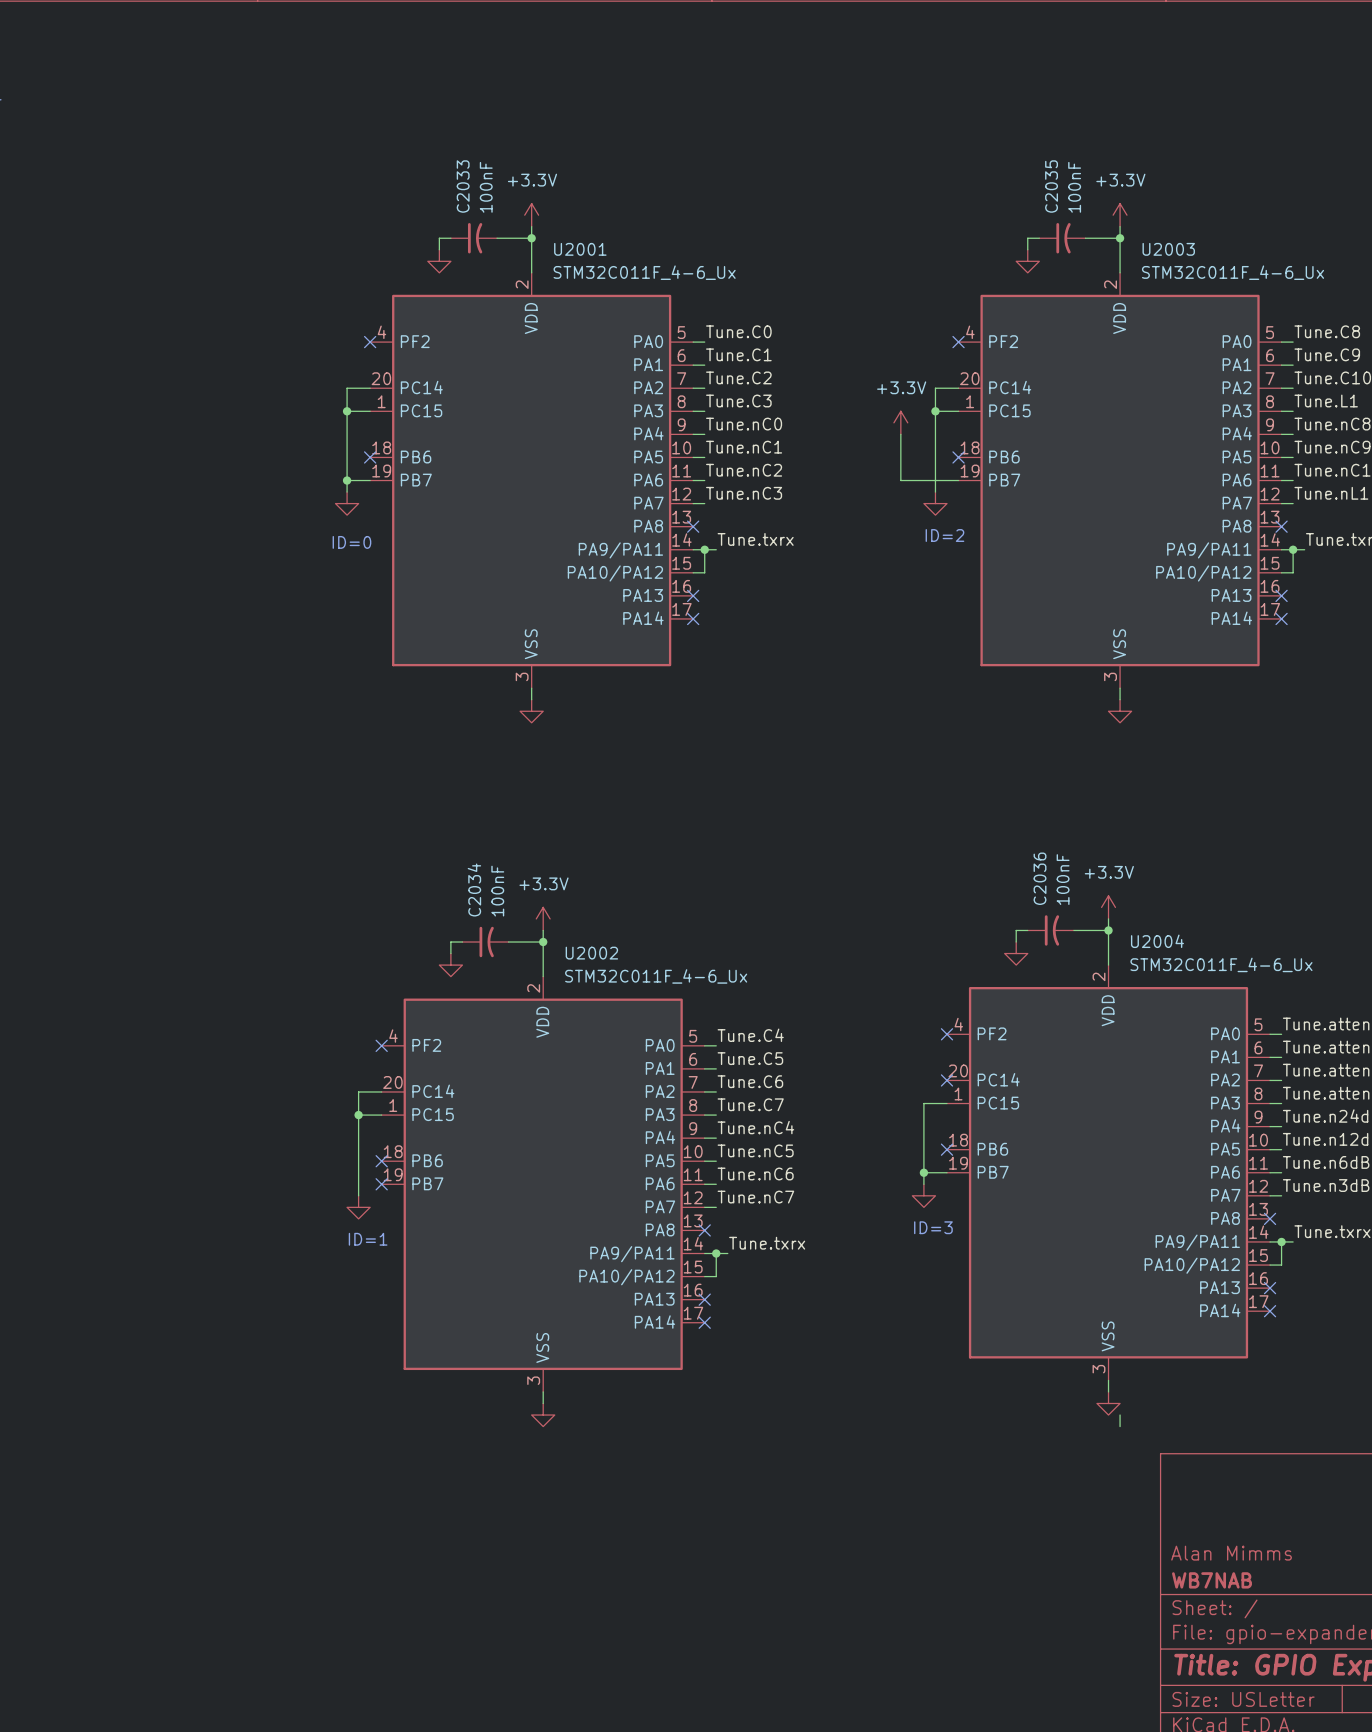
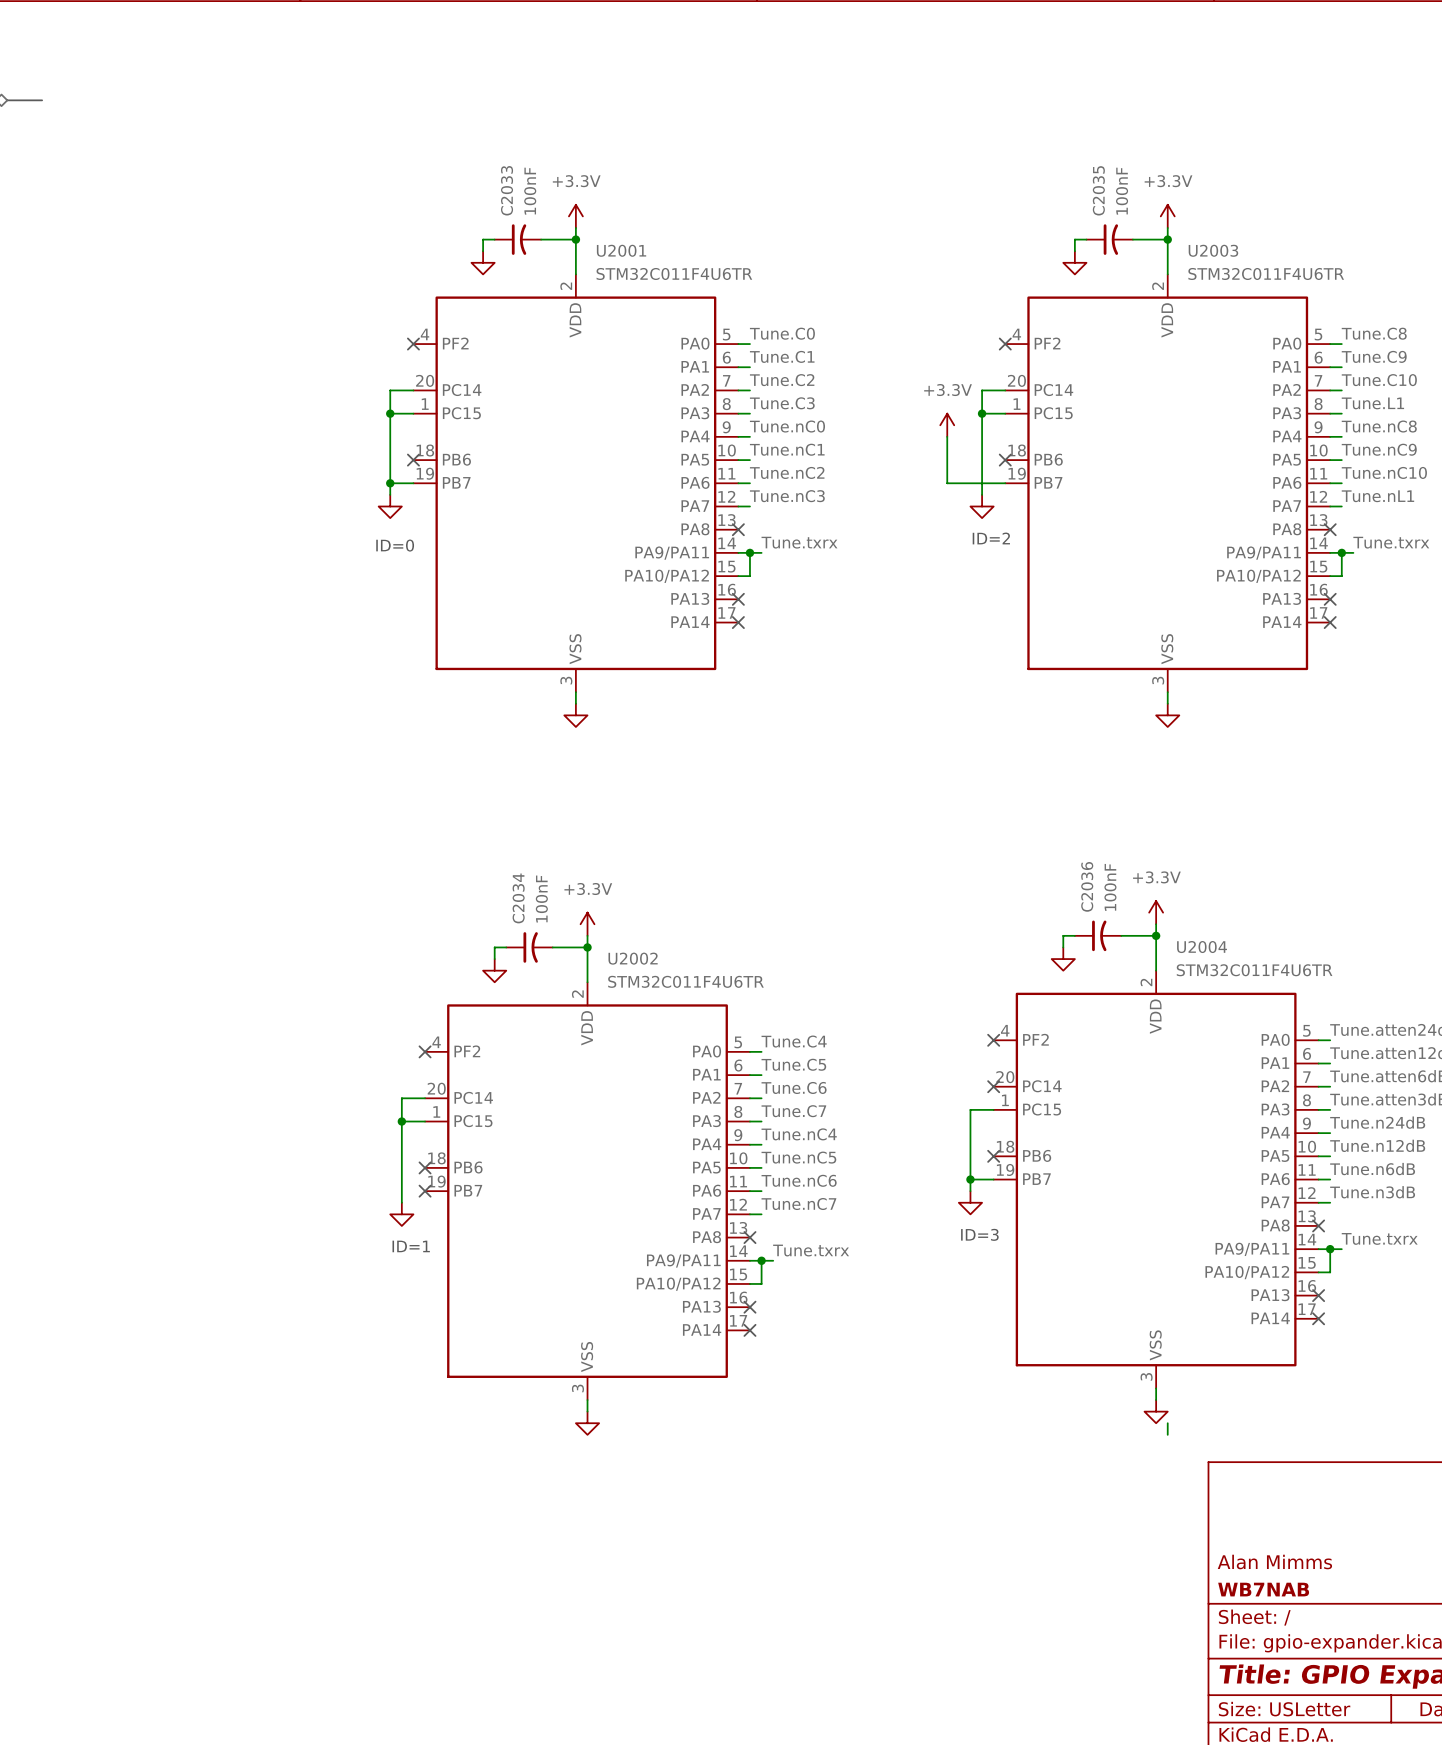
U2001 value: STM32C011F_4-6_Ux (644, 272) -> STM32C011F4U6TR (674, 273)
U2003 value: STM32C011F_4-6_Ux (1233, 272) -> STM32C011F4U6TR (1266, 273)
U2004 value: STM32C011F_4-6_Ux (1221, 964) -> STM32C011F4U6TR (1254, 970)
U2002 value: STM32C011F_4-6_Ux (656, 976) -> STM32C011F4U6TR (685, 981)

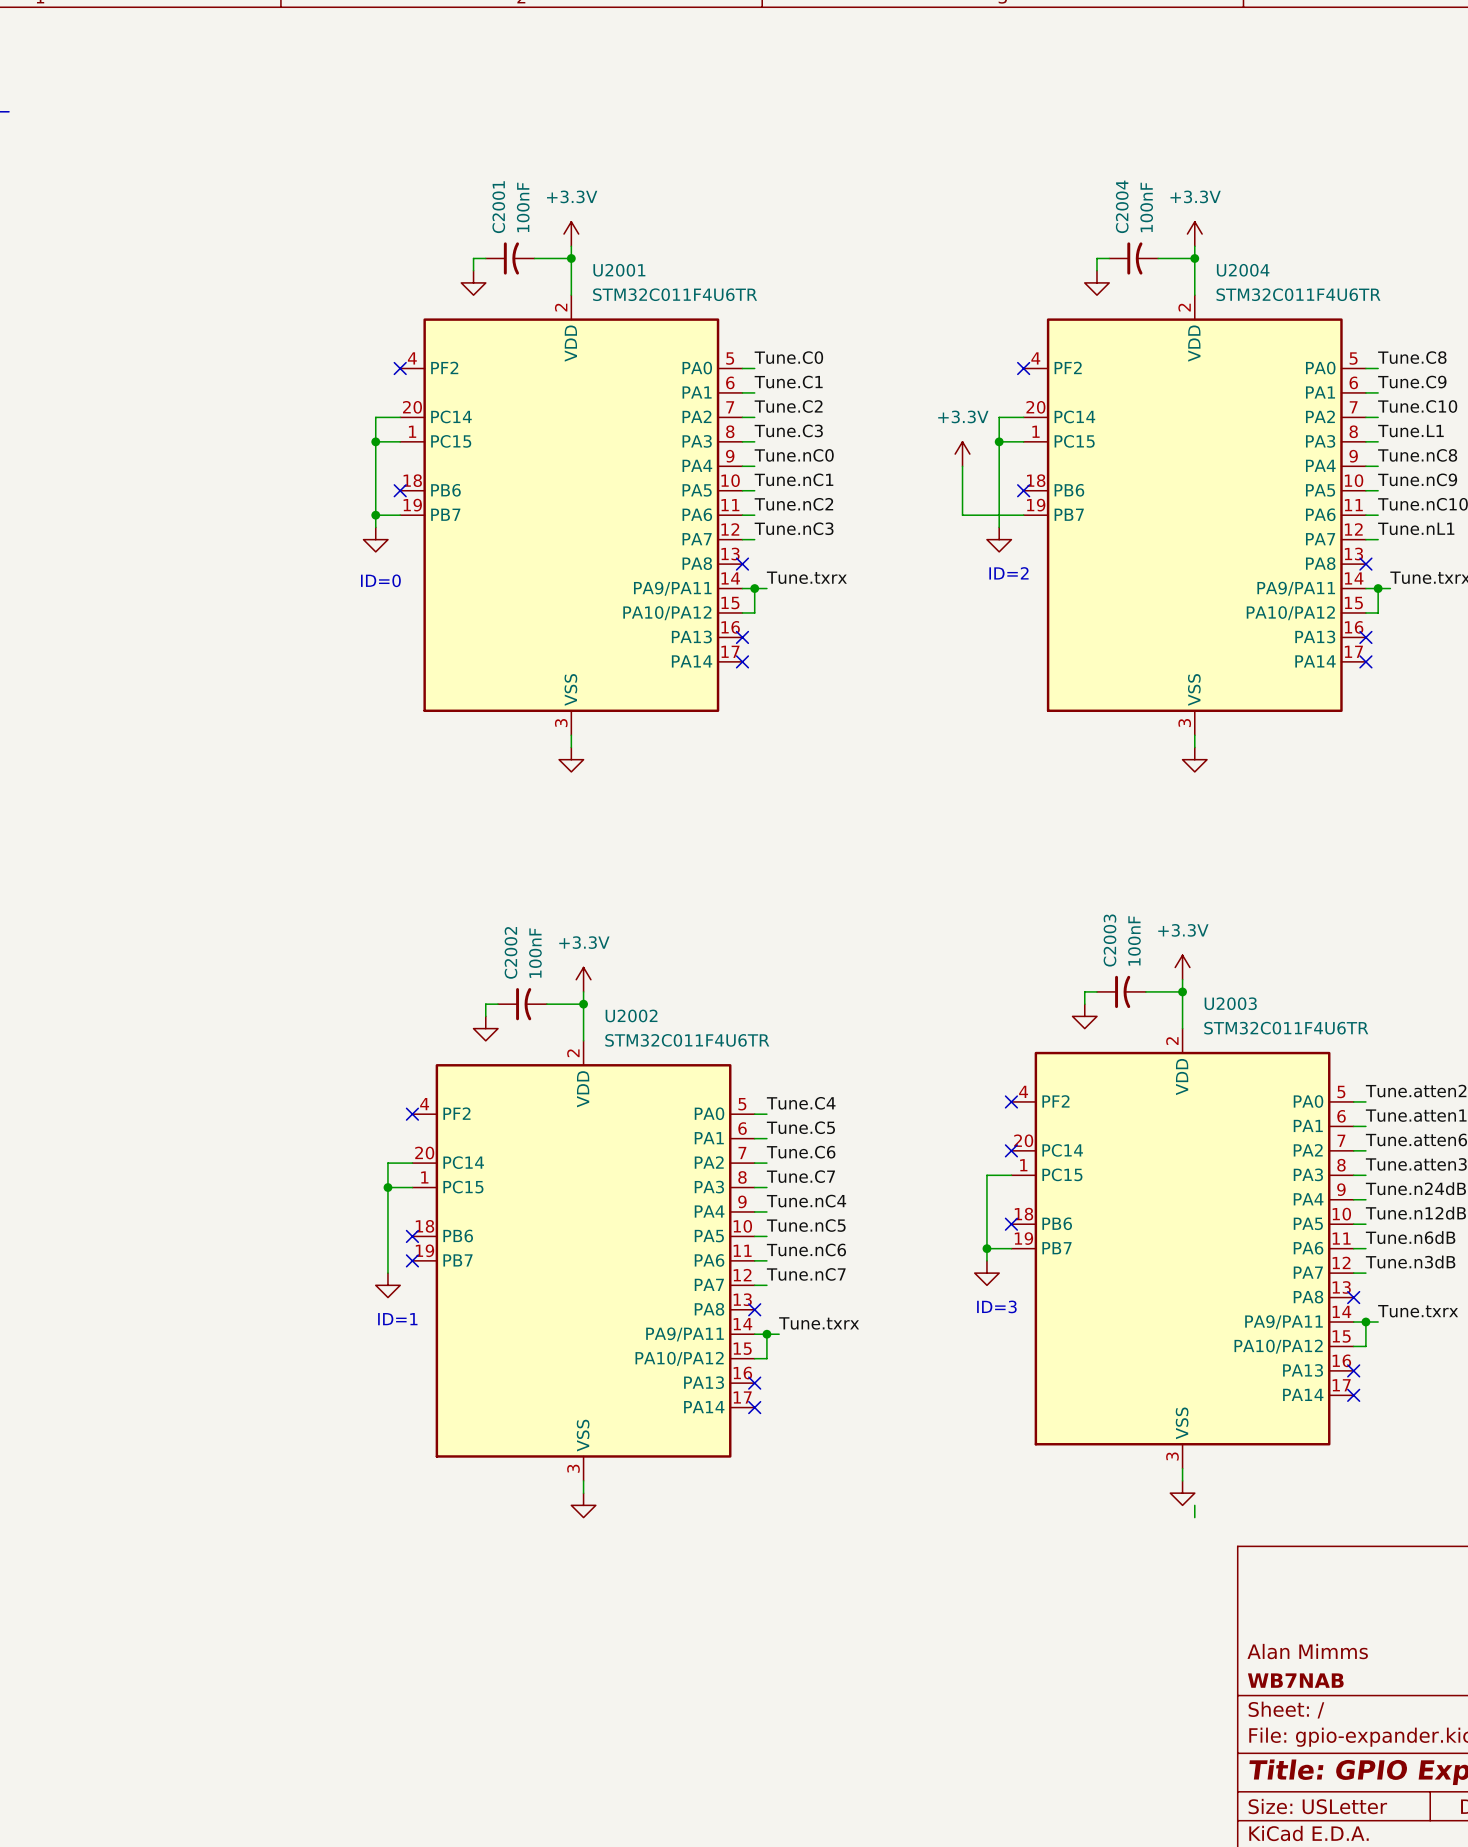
C2033 name: C2033 (507, 190) -> C2001 (498, 207)
C2035 name: C2035 (1098, 190) -> C2004 (1122, 206)
U2003 name: U2003 (1213, 250) -> U2004 (1243, 270)
C2036 name: C2036 (1087, 886) -> C2003 (1109, 940)
C2034 name: C2034 (518, 898) -> C2002 (510, 952)
U2004 name: U2004 (1202, 947) -> U2003 (1230, 1003)

